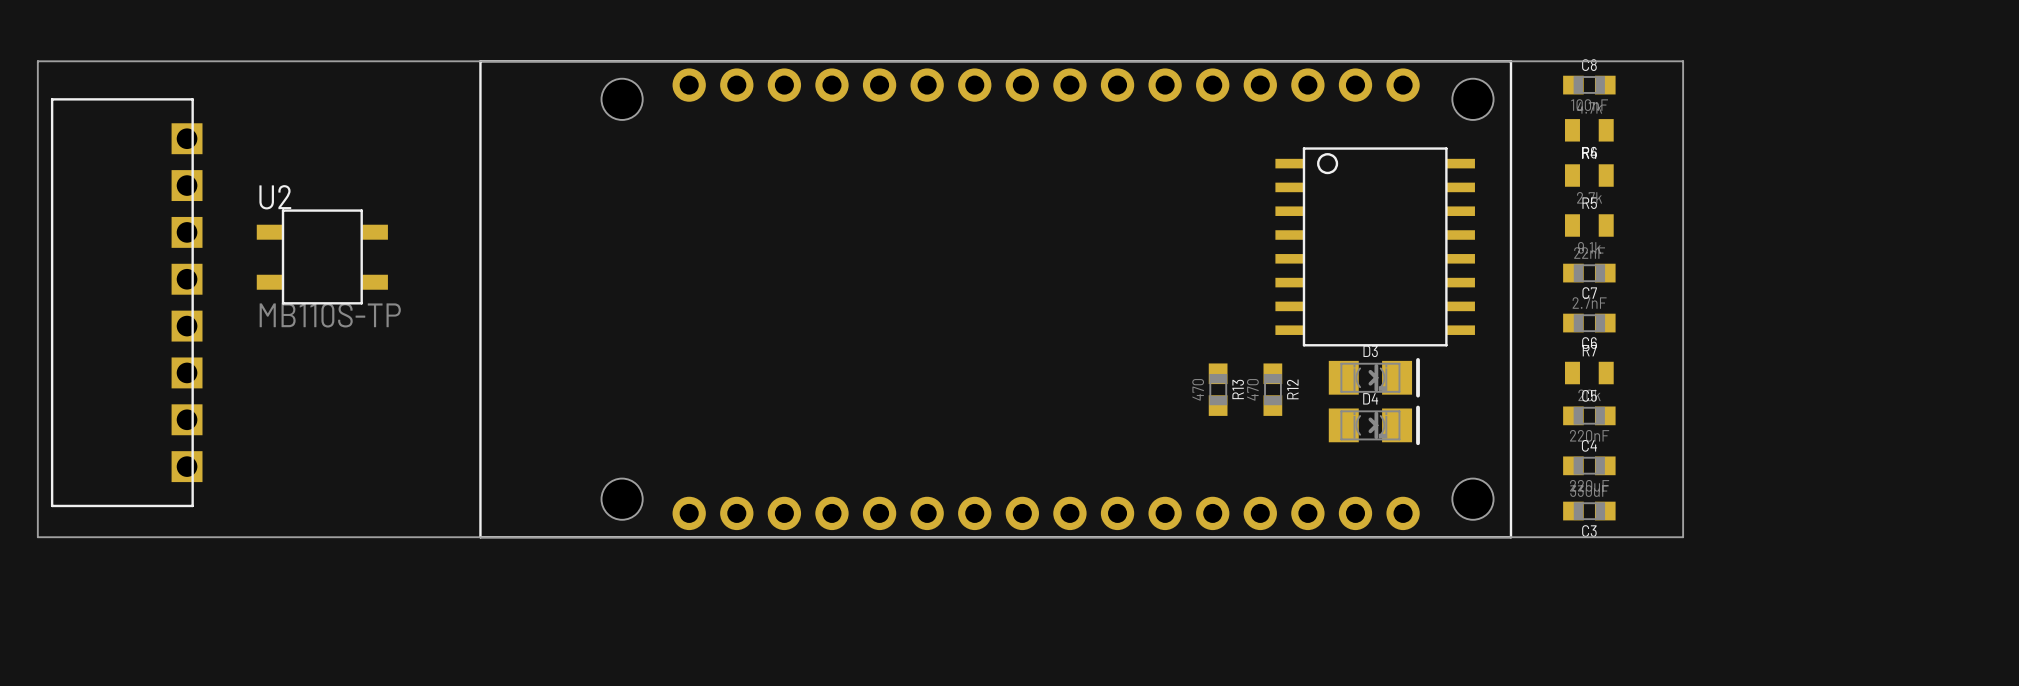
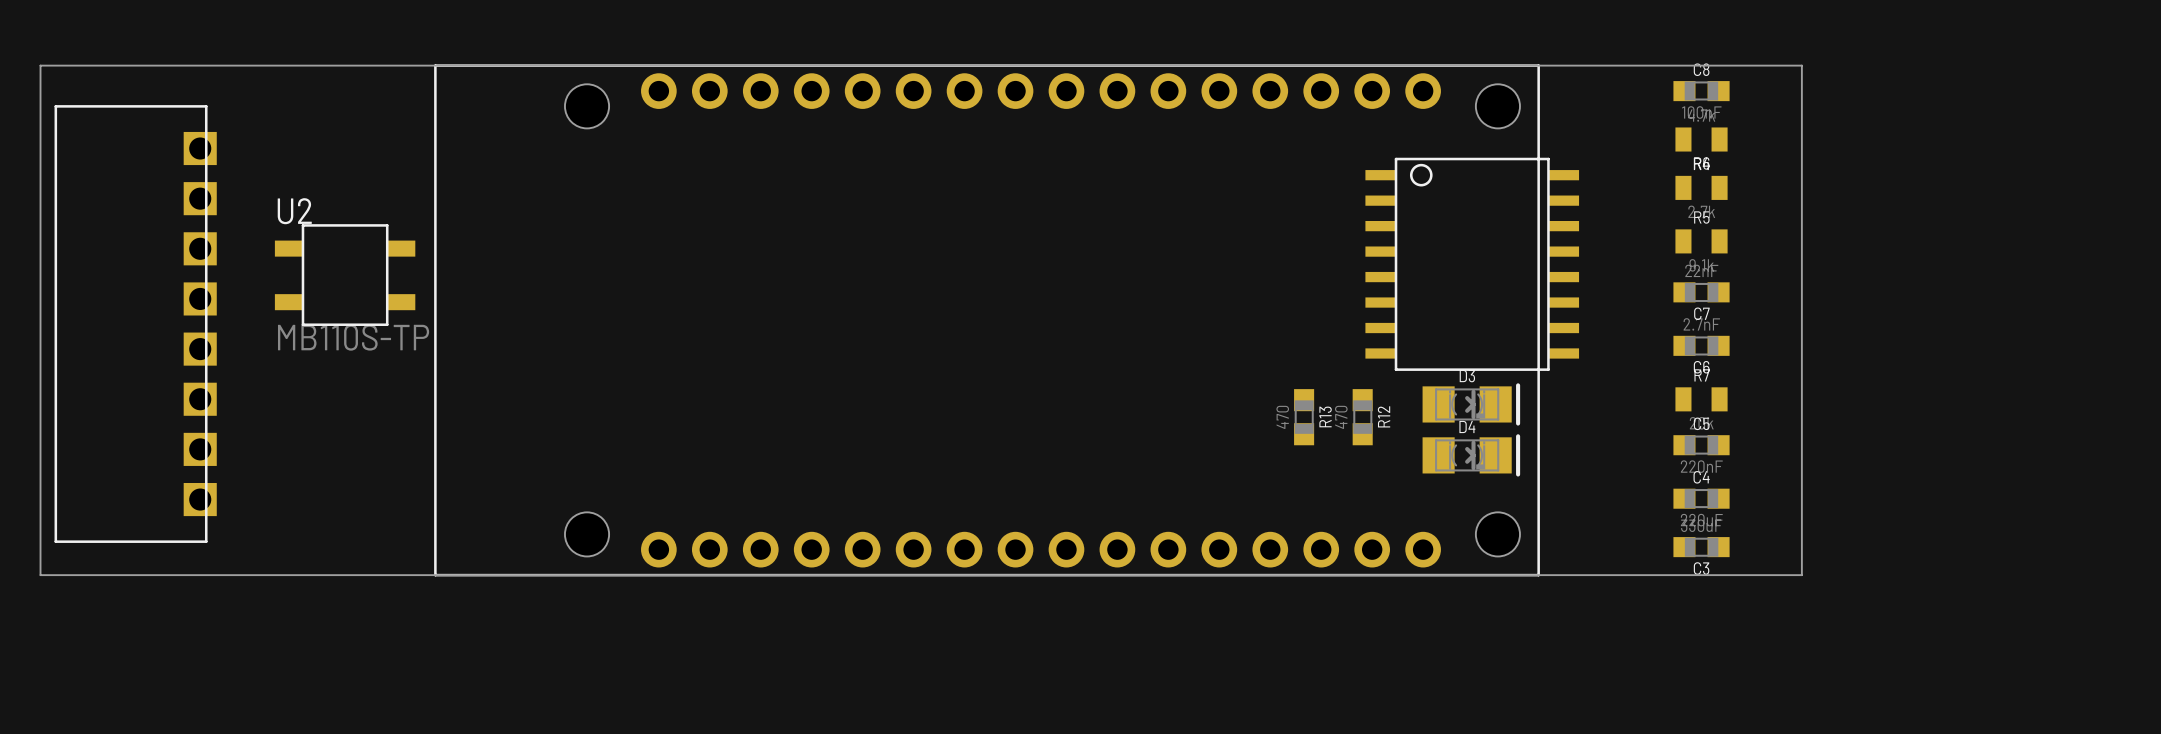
part position: (995, 299) -> (987, 320)

